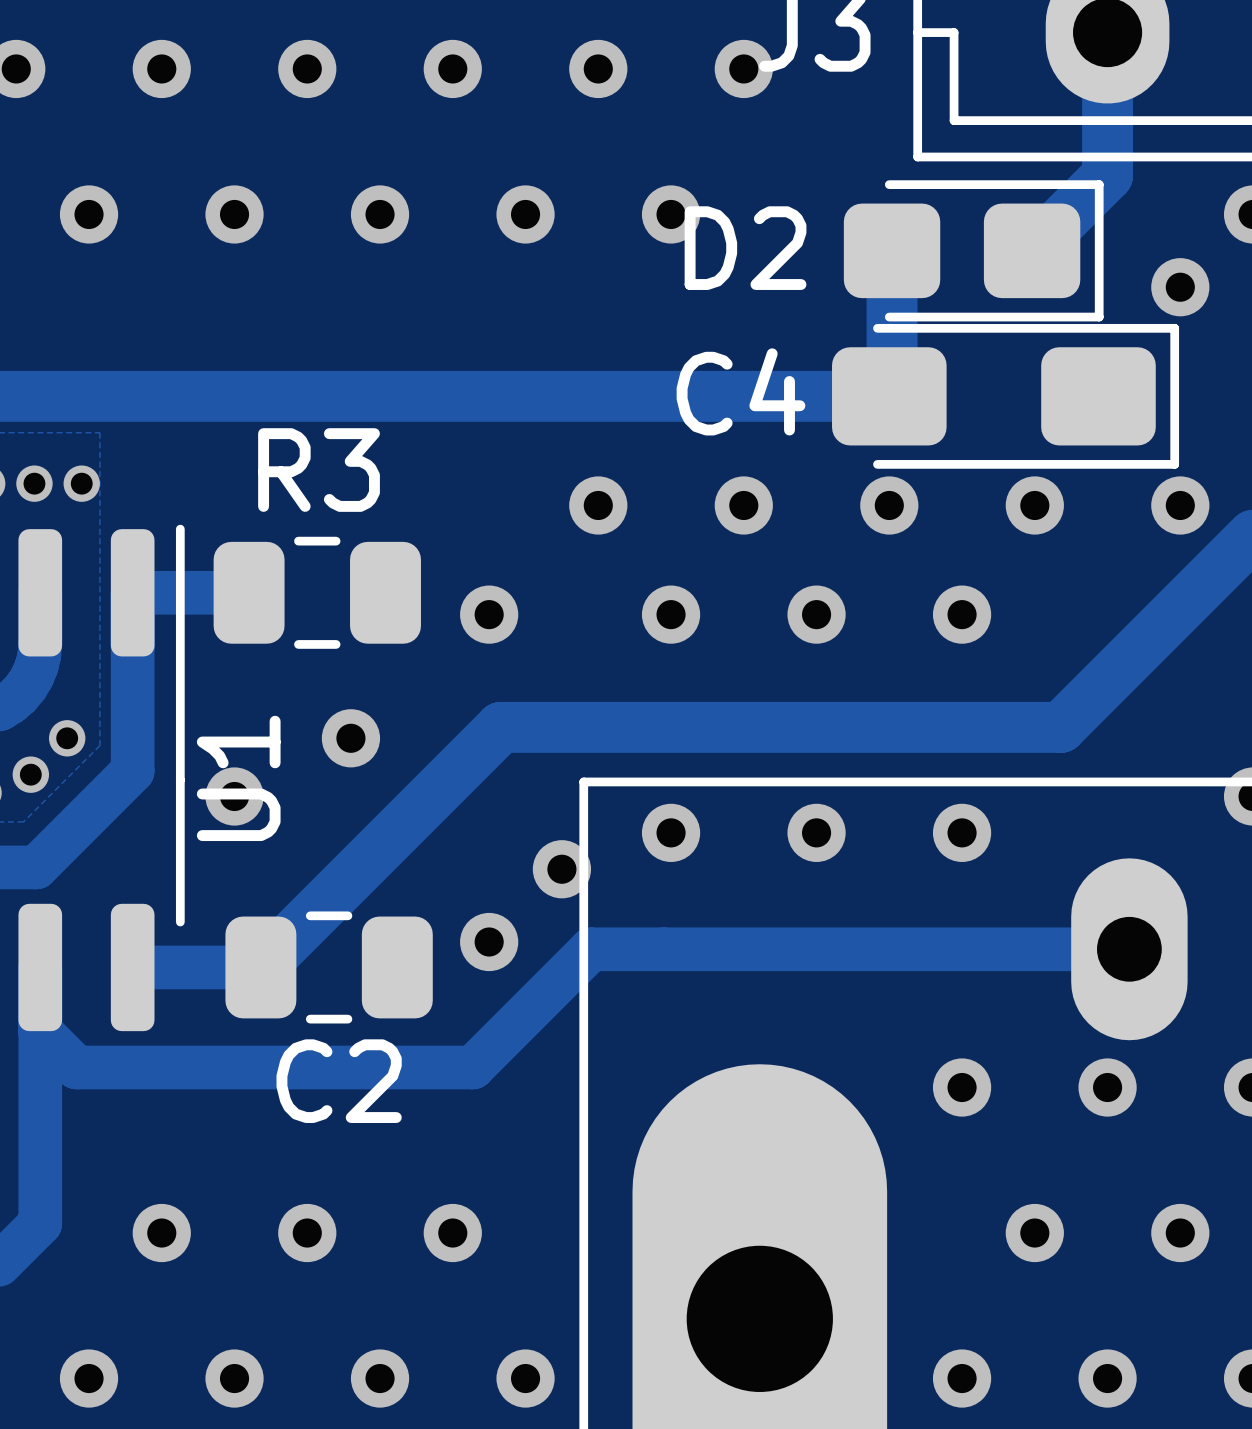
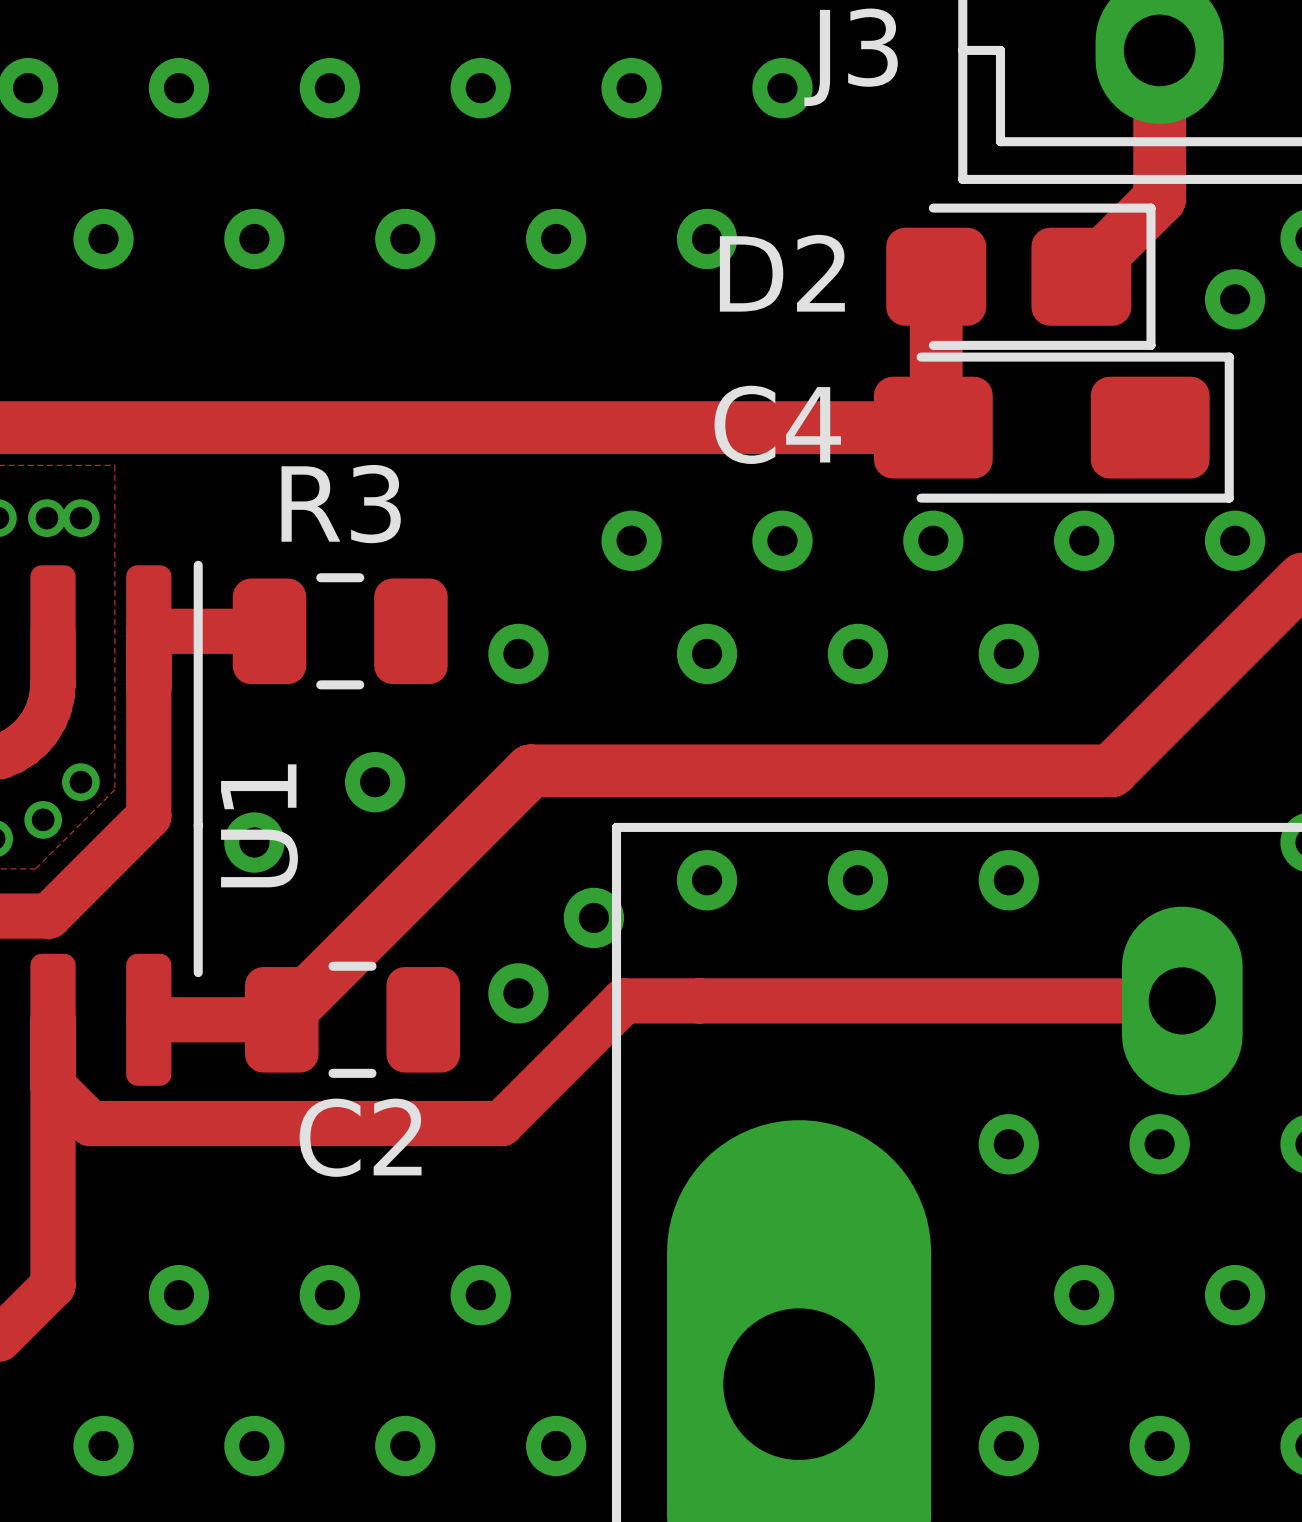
via position: (1180, 287) -> (1235, 299)
via position: (81, 483) -> (80, 518)

